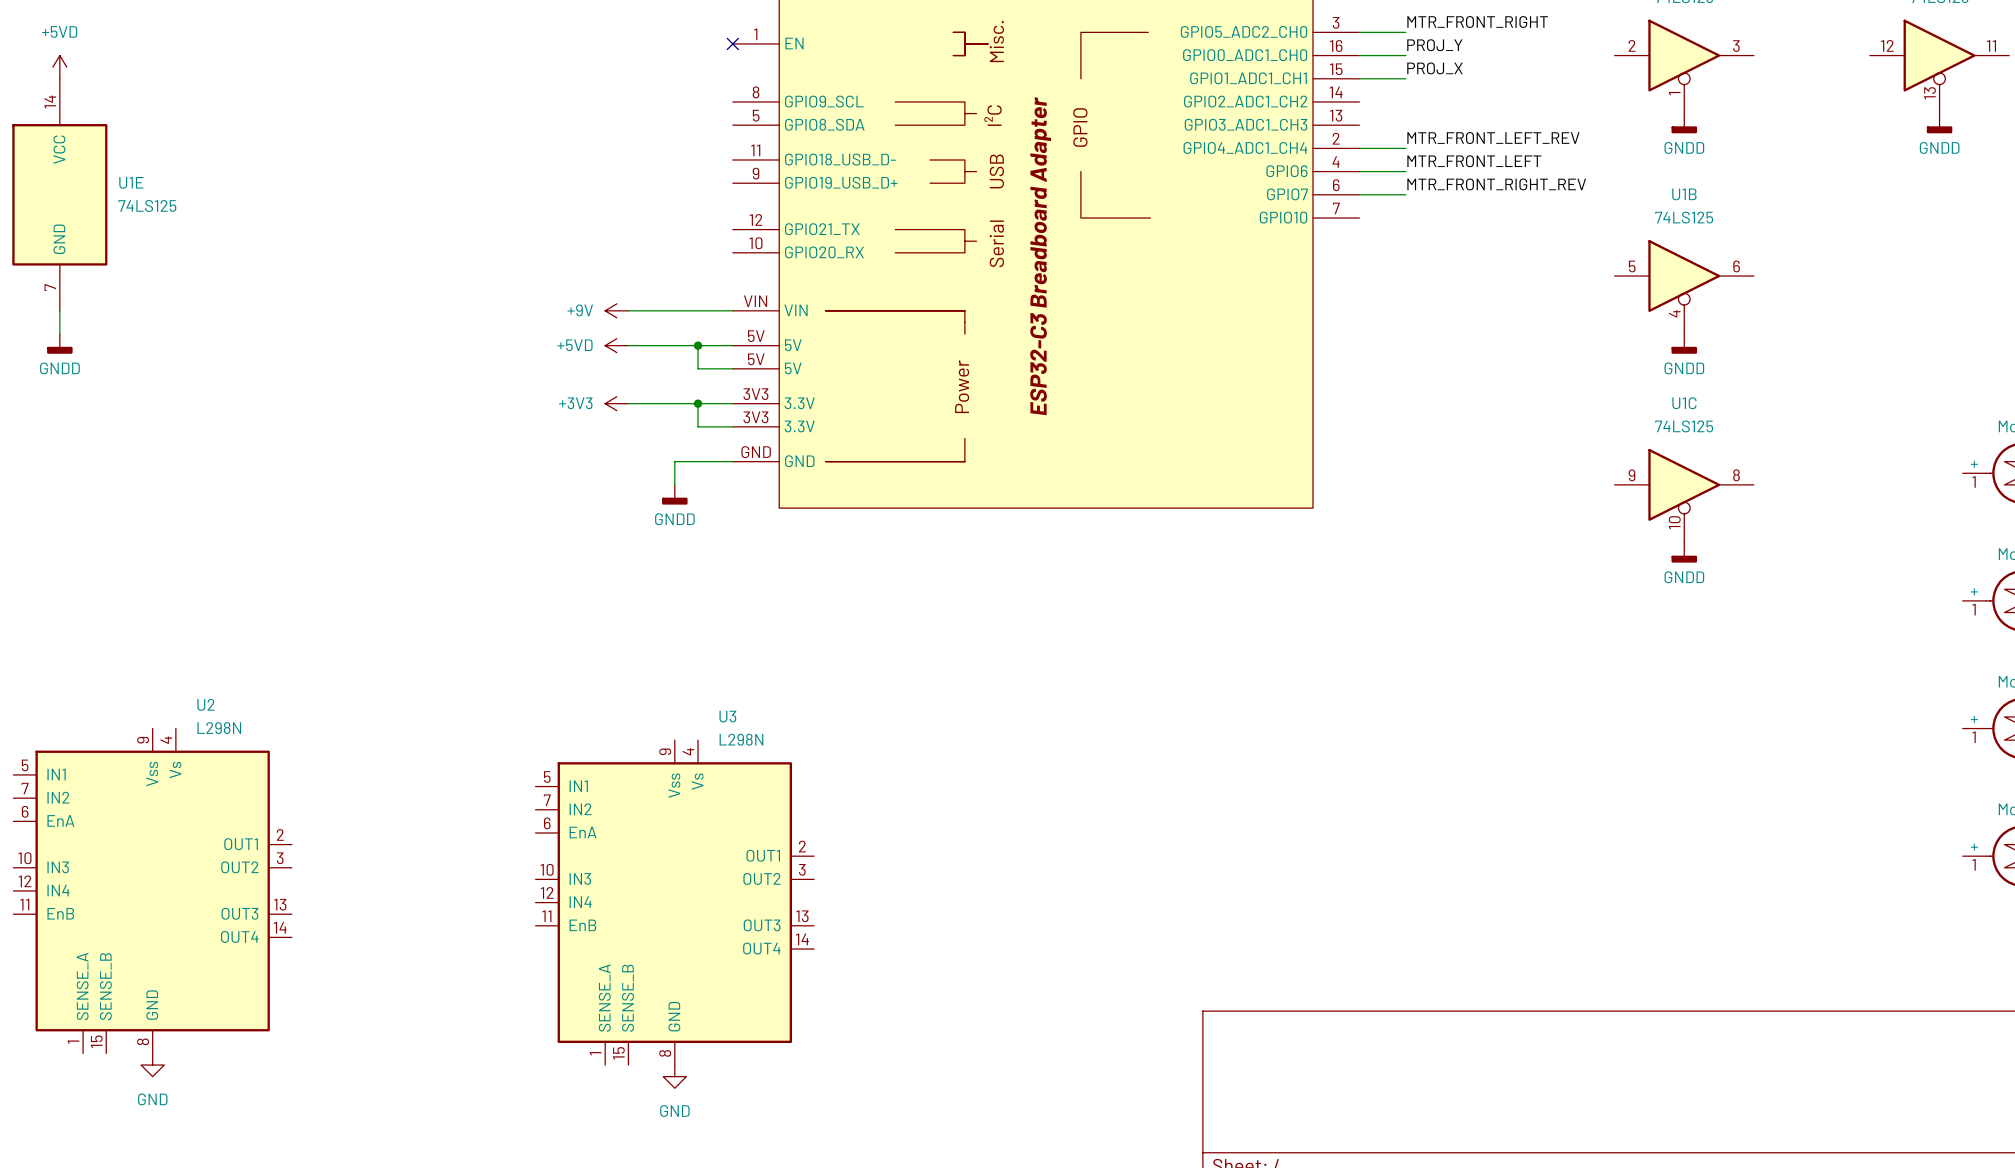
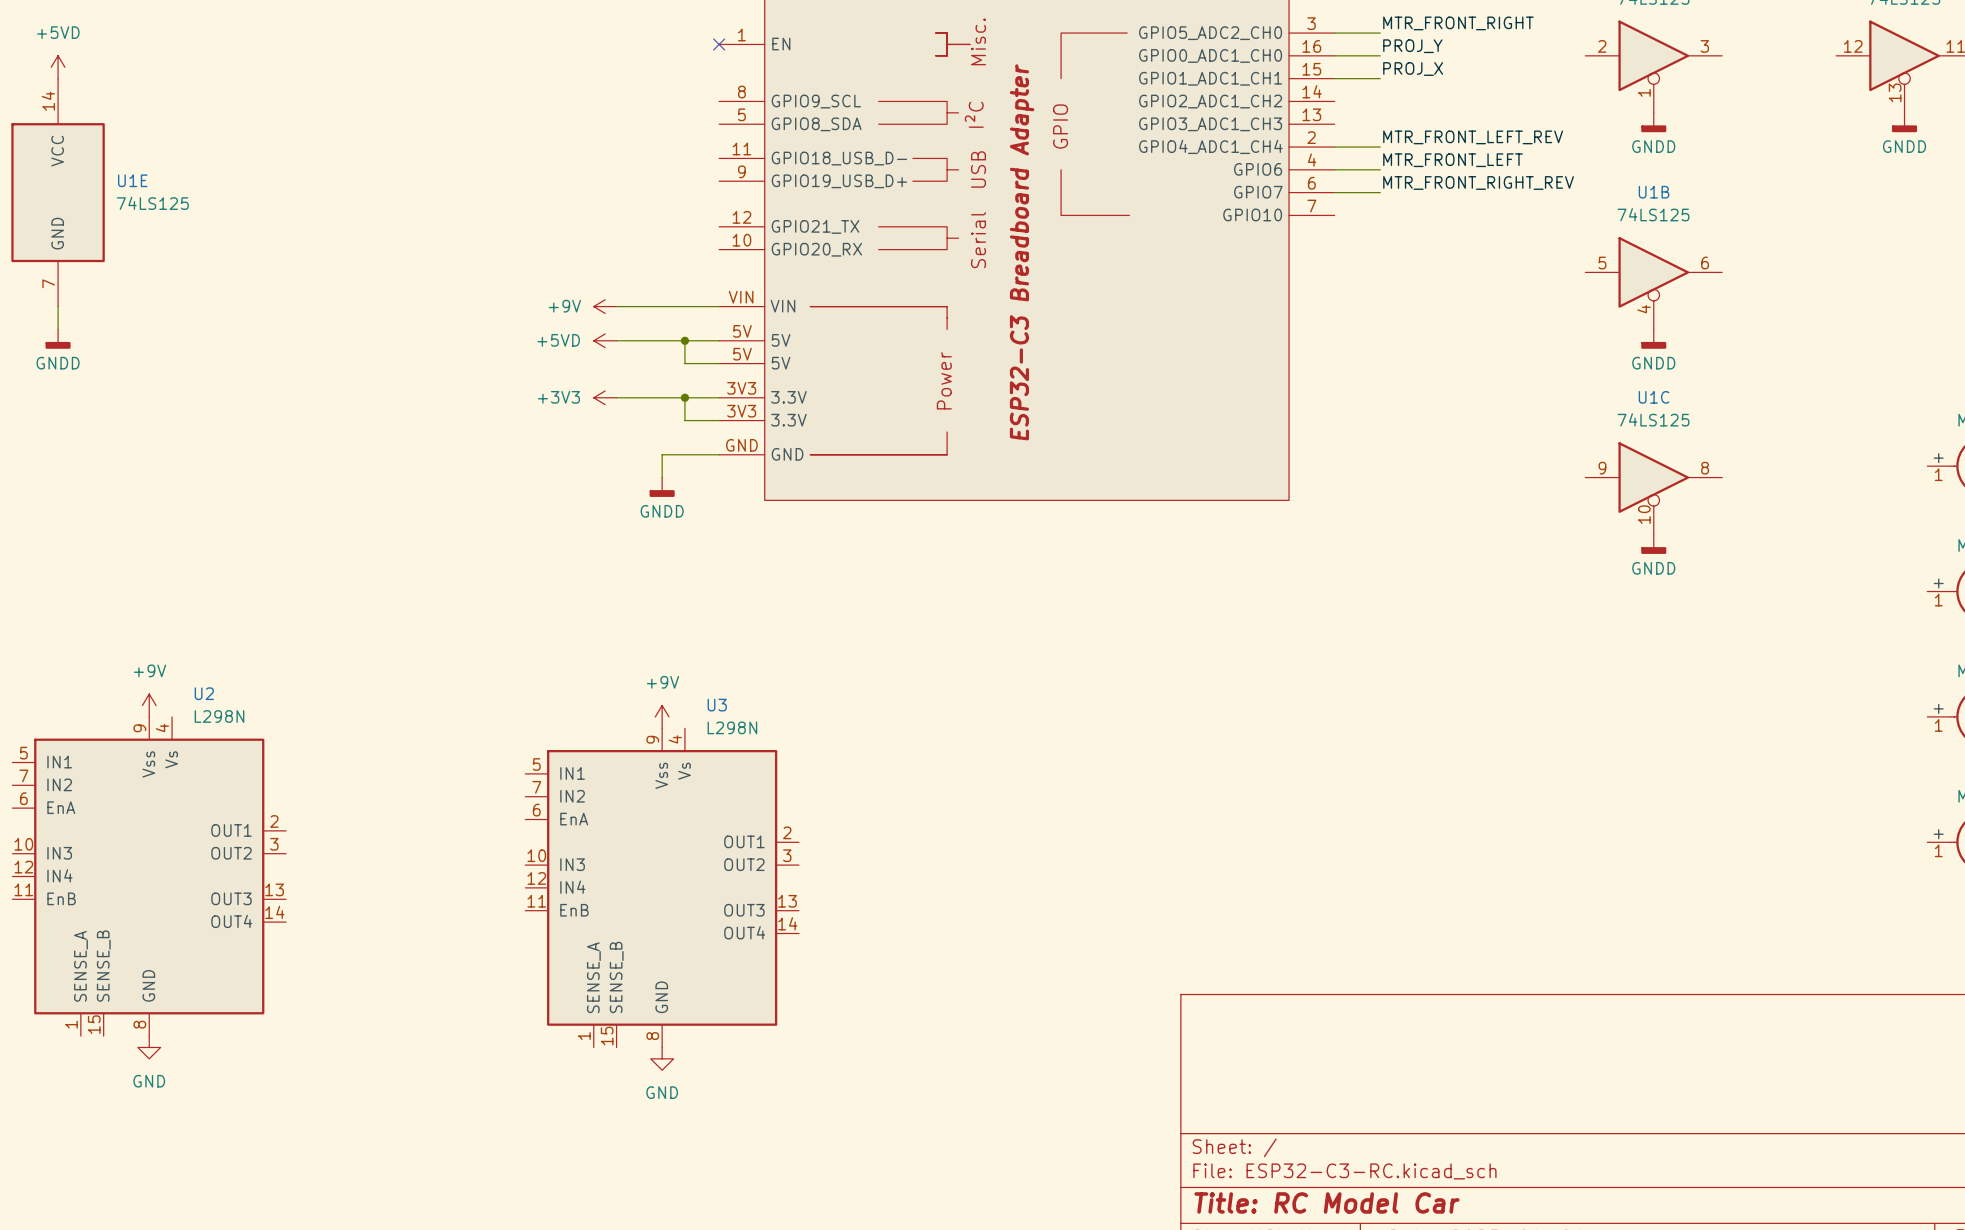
power symbol: none -> +9V (149, 705)
power symbol: none -> +9V (662, 716)

